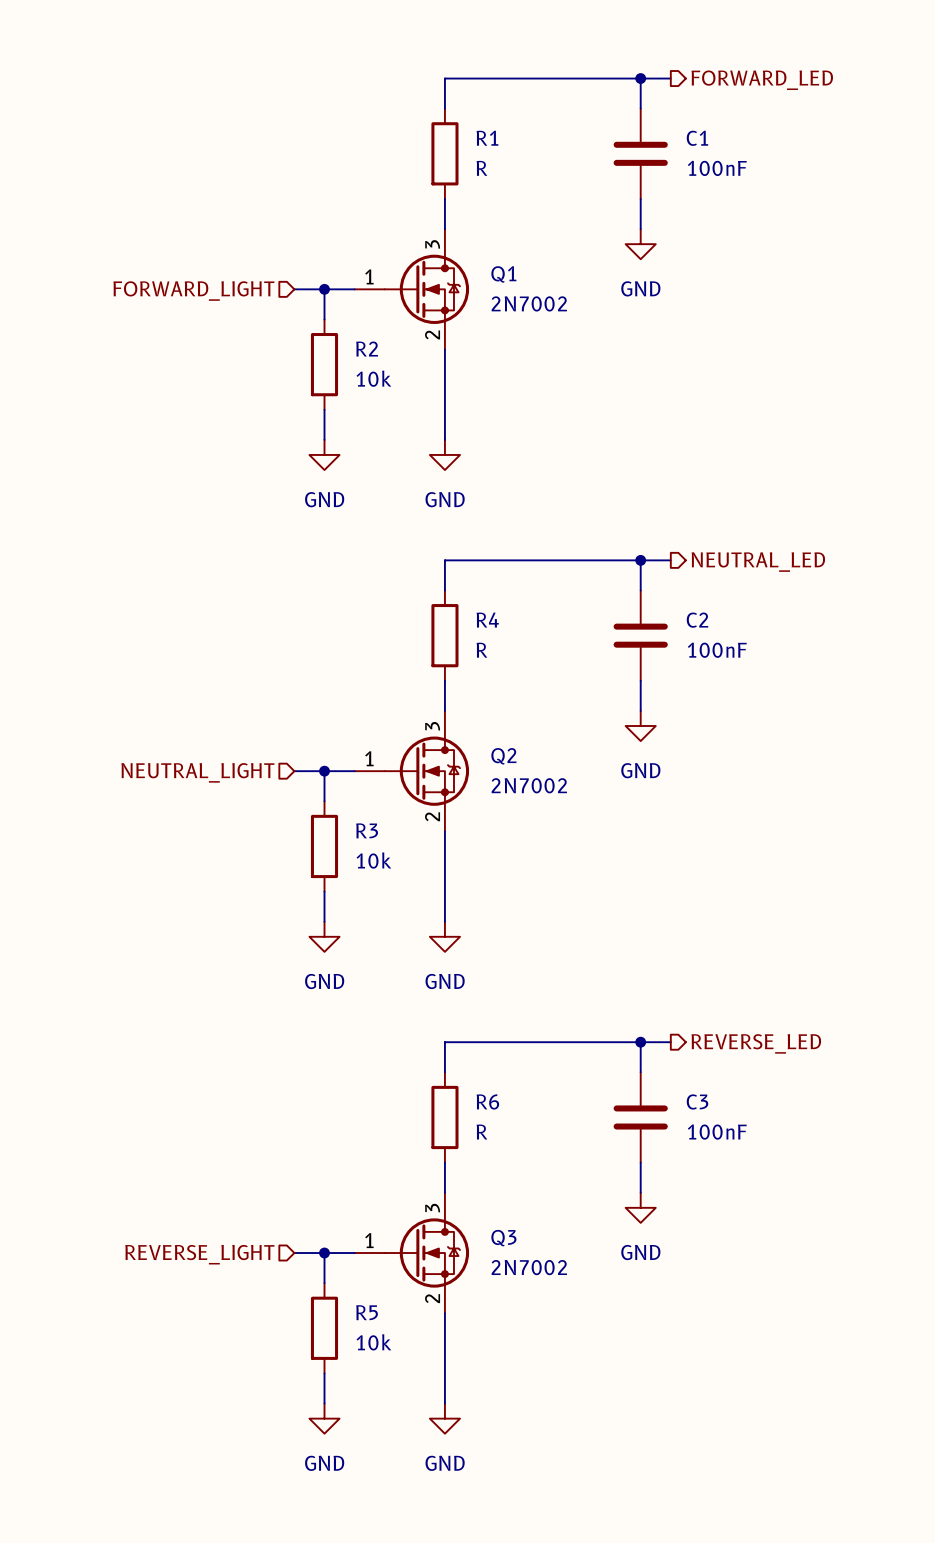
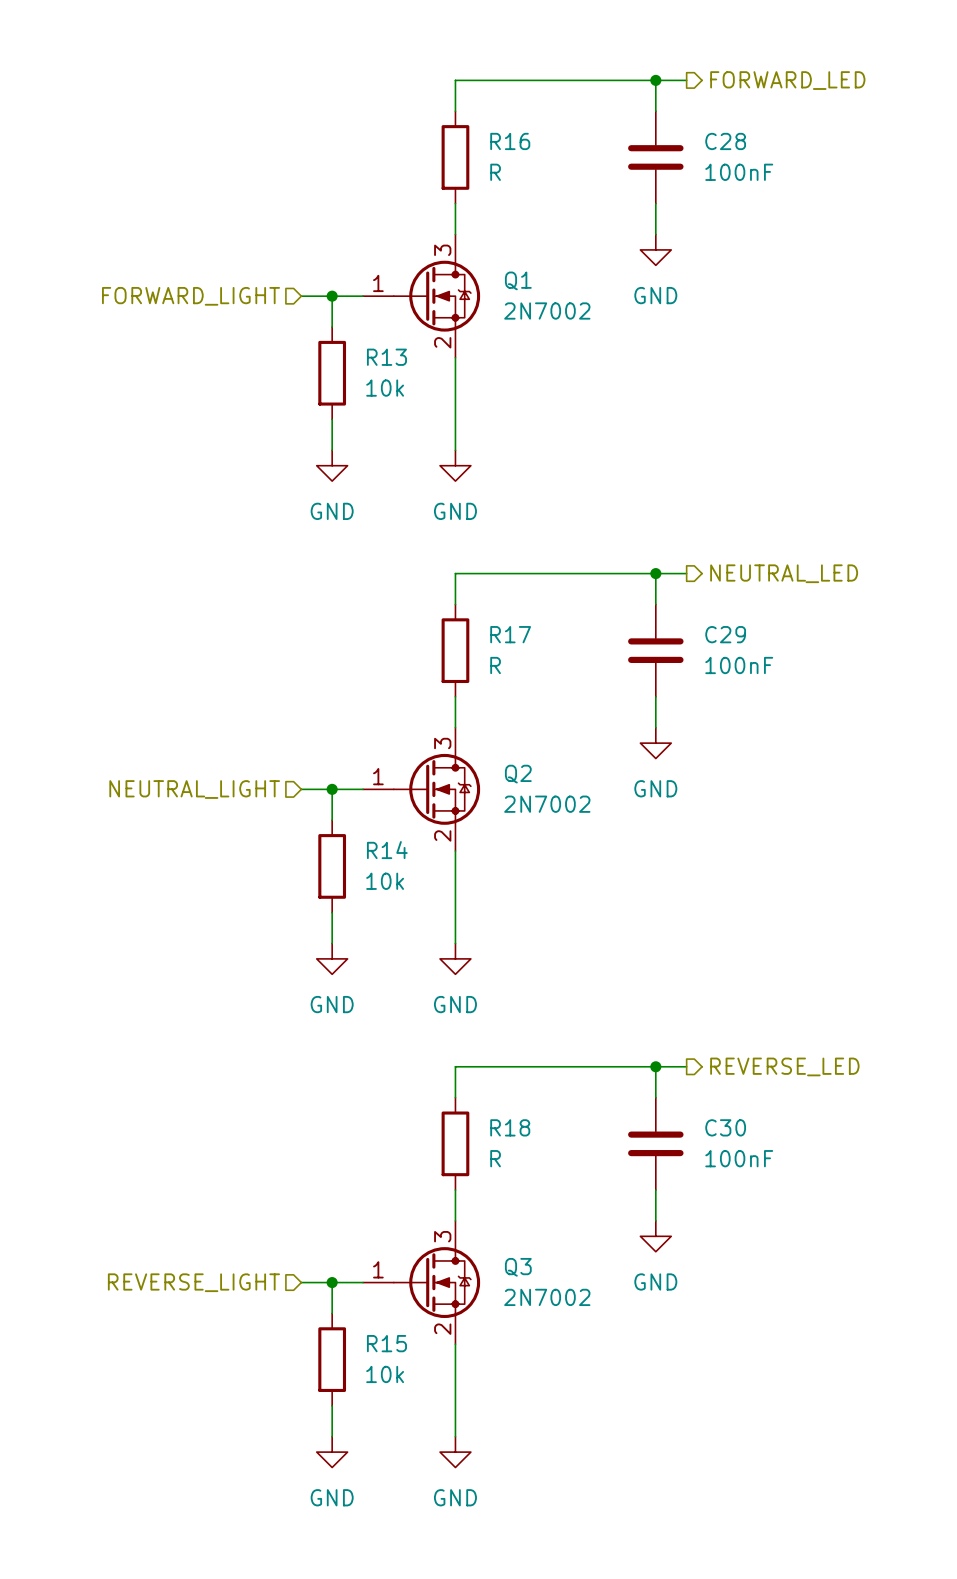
R1 name: R1 (487, 138) -> R16 (510, 141)
C1 name: C1 (697, 138) -> C28 (725, 141)
R2 name: R2 (367, 349) -> R13 (386, 357)
R4 name: R4 (487, 620) -> R17 (510, 634)
C2 name: C2 (697, 620) -> C29 (725, 634)
R3 name: R3 (367, 830) -> R14 (387, 850)
R6 name: R6 (487, 1101) -> R18 (510, 1127)
C3 name: C3 (697, 1101) -> C30 (725, 1127)
R5 name: R5 (367, 1312) -> R15 (386, 1343)

